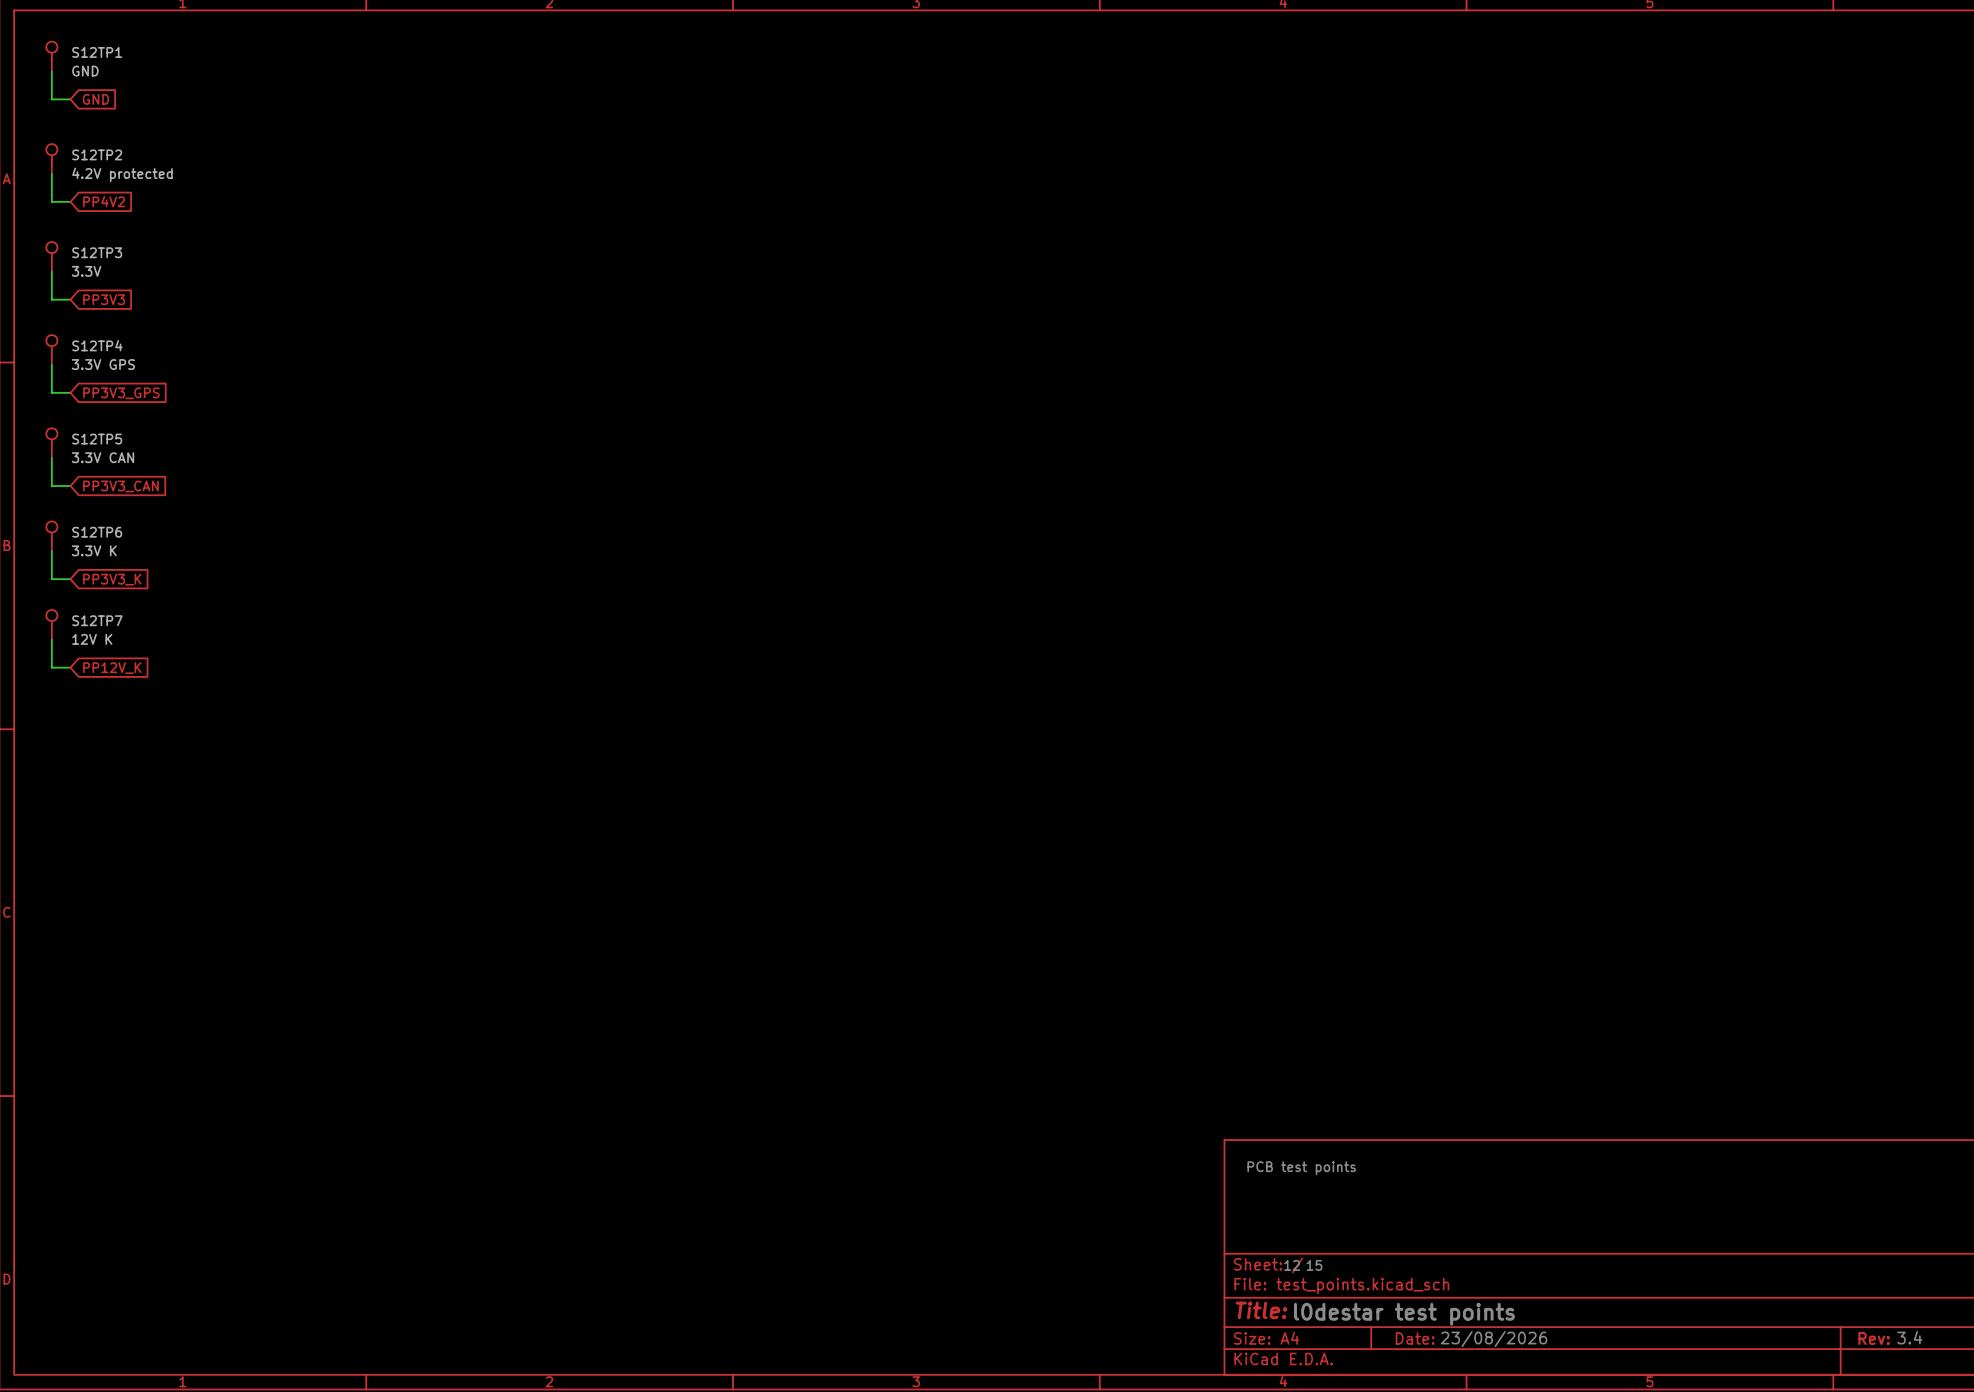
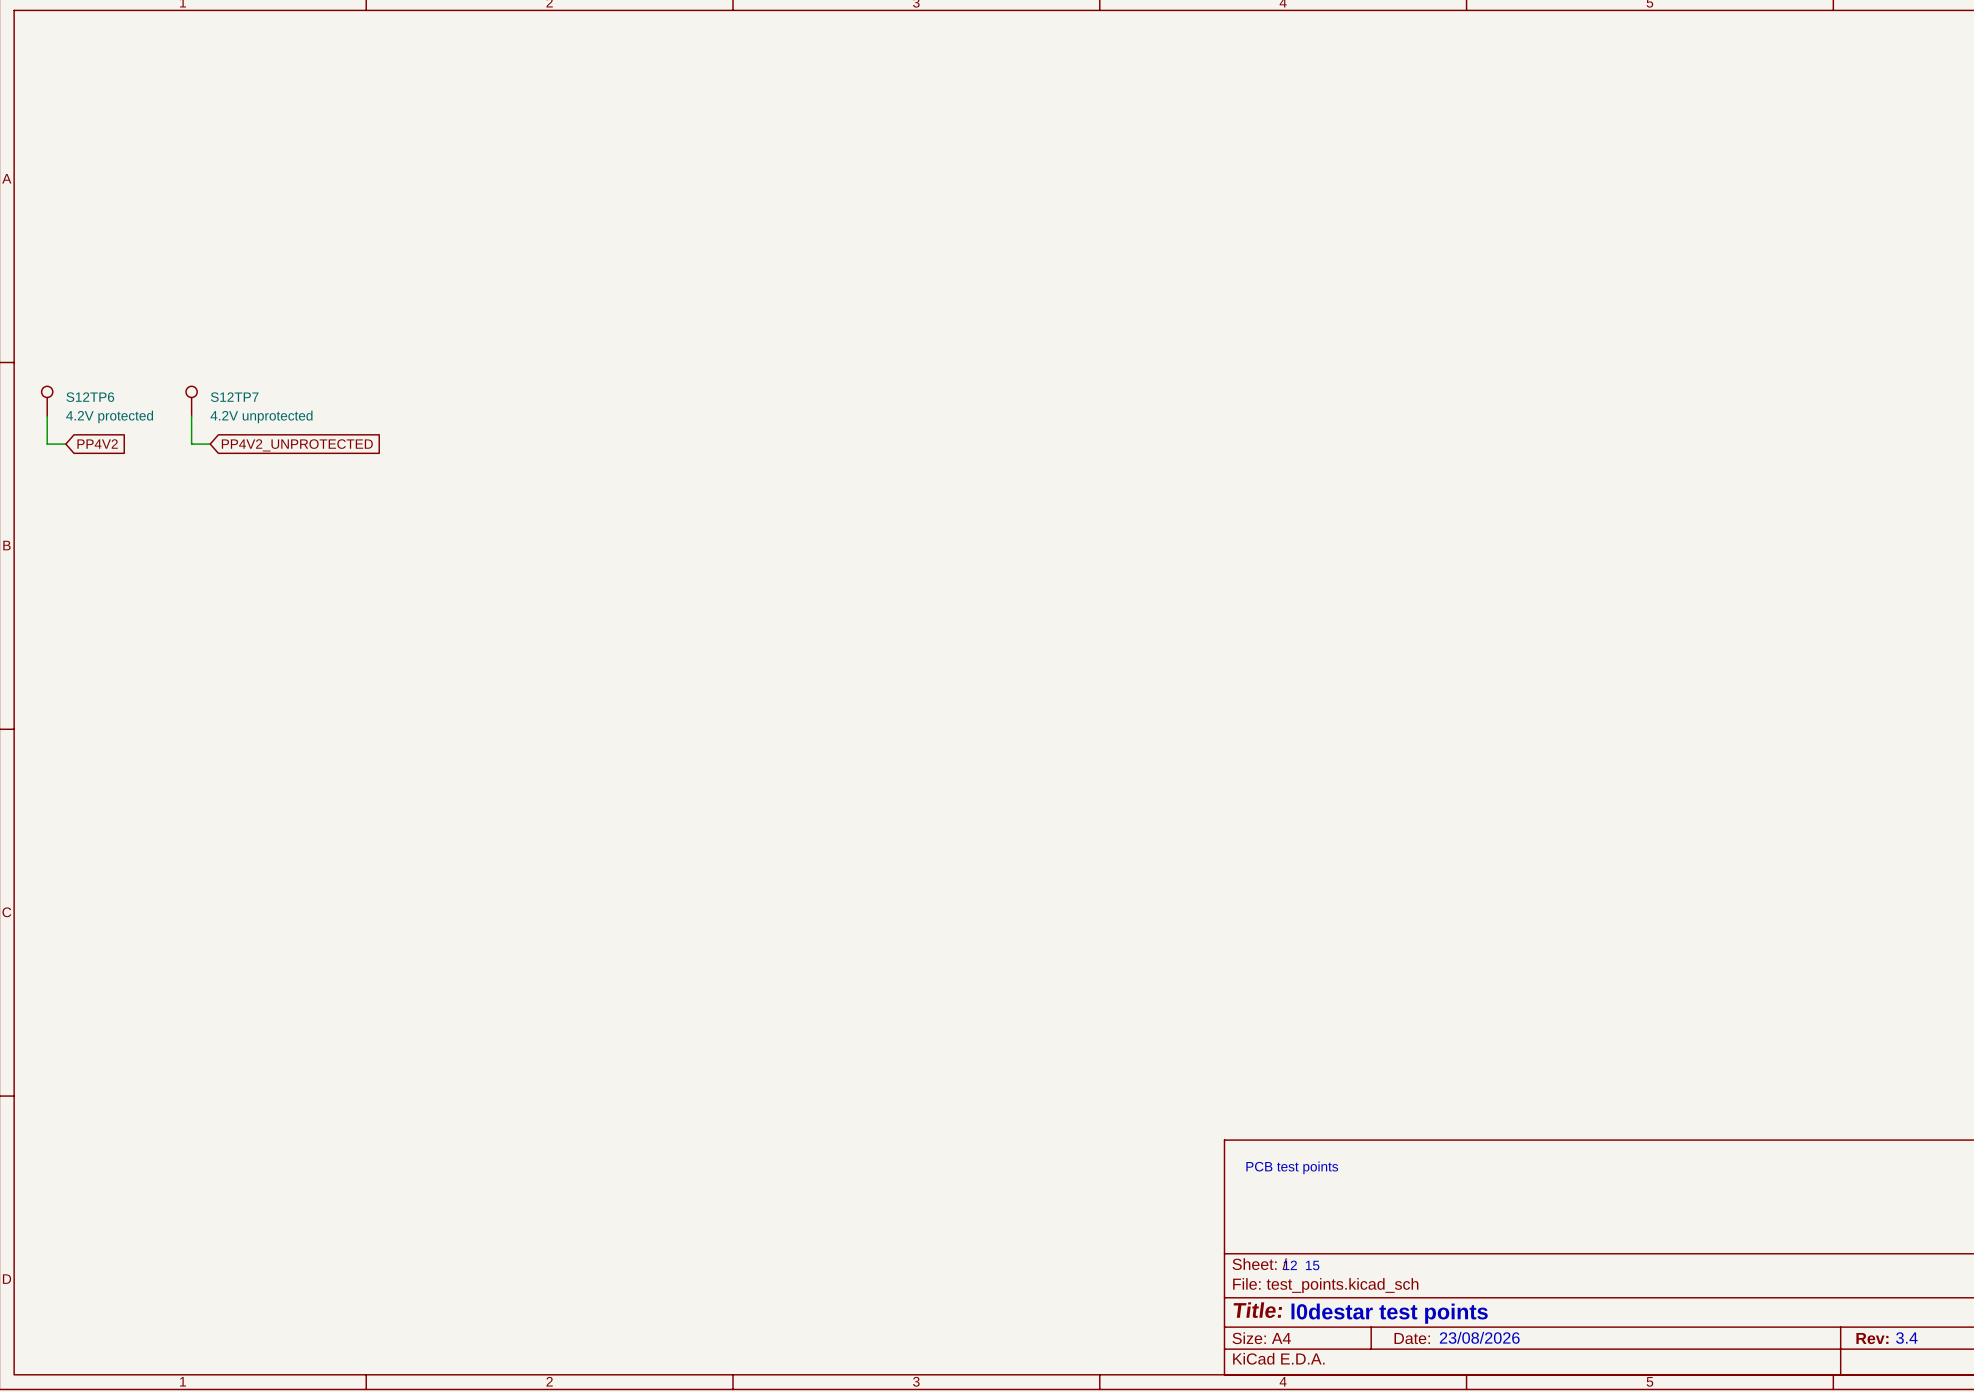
S12TP1: GND (51, 56) -> none
wire: (51, 71) (51, 99) (70, 99) -> none
global label: GND (95, 99) -> none
S12TP2: 4.2V protected (51, 159) -> none
wire: (51, 173) (51, 201) (70, 201) -> none
global label: PP4V2 (104, 201) -> none
S12TP3: 3.3V (51, 256) -> none
wire: (51, 271) (51, 299) (70, 299) -> none
global label: PP3V3 (104, 299) -> none
S12TP4: 3.3V GPS (51, 349) -> none
wire: (51, 364) (51, 392) (70, 392) -> (191, 416) (191, 444) (210, 444)
global label: PP3V3_GPS (121, 393) -> none
S12TP5: 3.3V CAN (51, 443) -> none
global label: none -> PP4V2 (97, 444)
global label: none -> PP4V2_UNPROTECTED (297, 445)
wire: (51, 458) (51, 486) (70, 486) -> (47, 416) (47, 444) (65, 444)
global label: PP3V3_CAN (120, 486) -> none
S12TP6 position: (51, 536) -> (47, 401)
S12TP6 value: 3.3V K (94, 550) -> 4.2V protected (109, 416)
wire: (51, 551) (51, 579) (70, 579) -> none
global label: PP3V3_K (112, 579) -> none
S12TP7 position: (51, 624) -> (191, 401)
wire: (51, 639) (51, 667) (70, 667) -> none
S12TP7 value: 12V K (92, 639) -> 4.2V unprotected (261, 416)
global label: PP12V_K (112, 668) -> none

